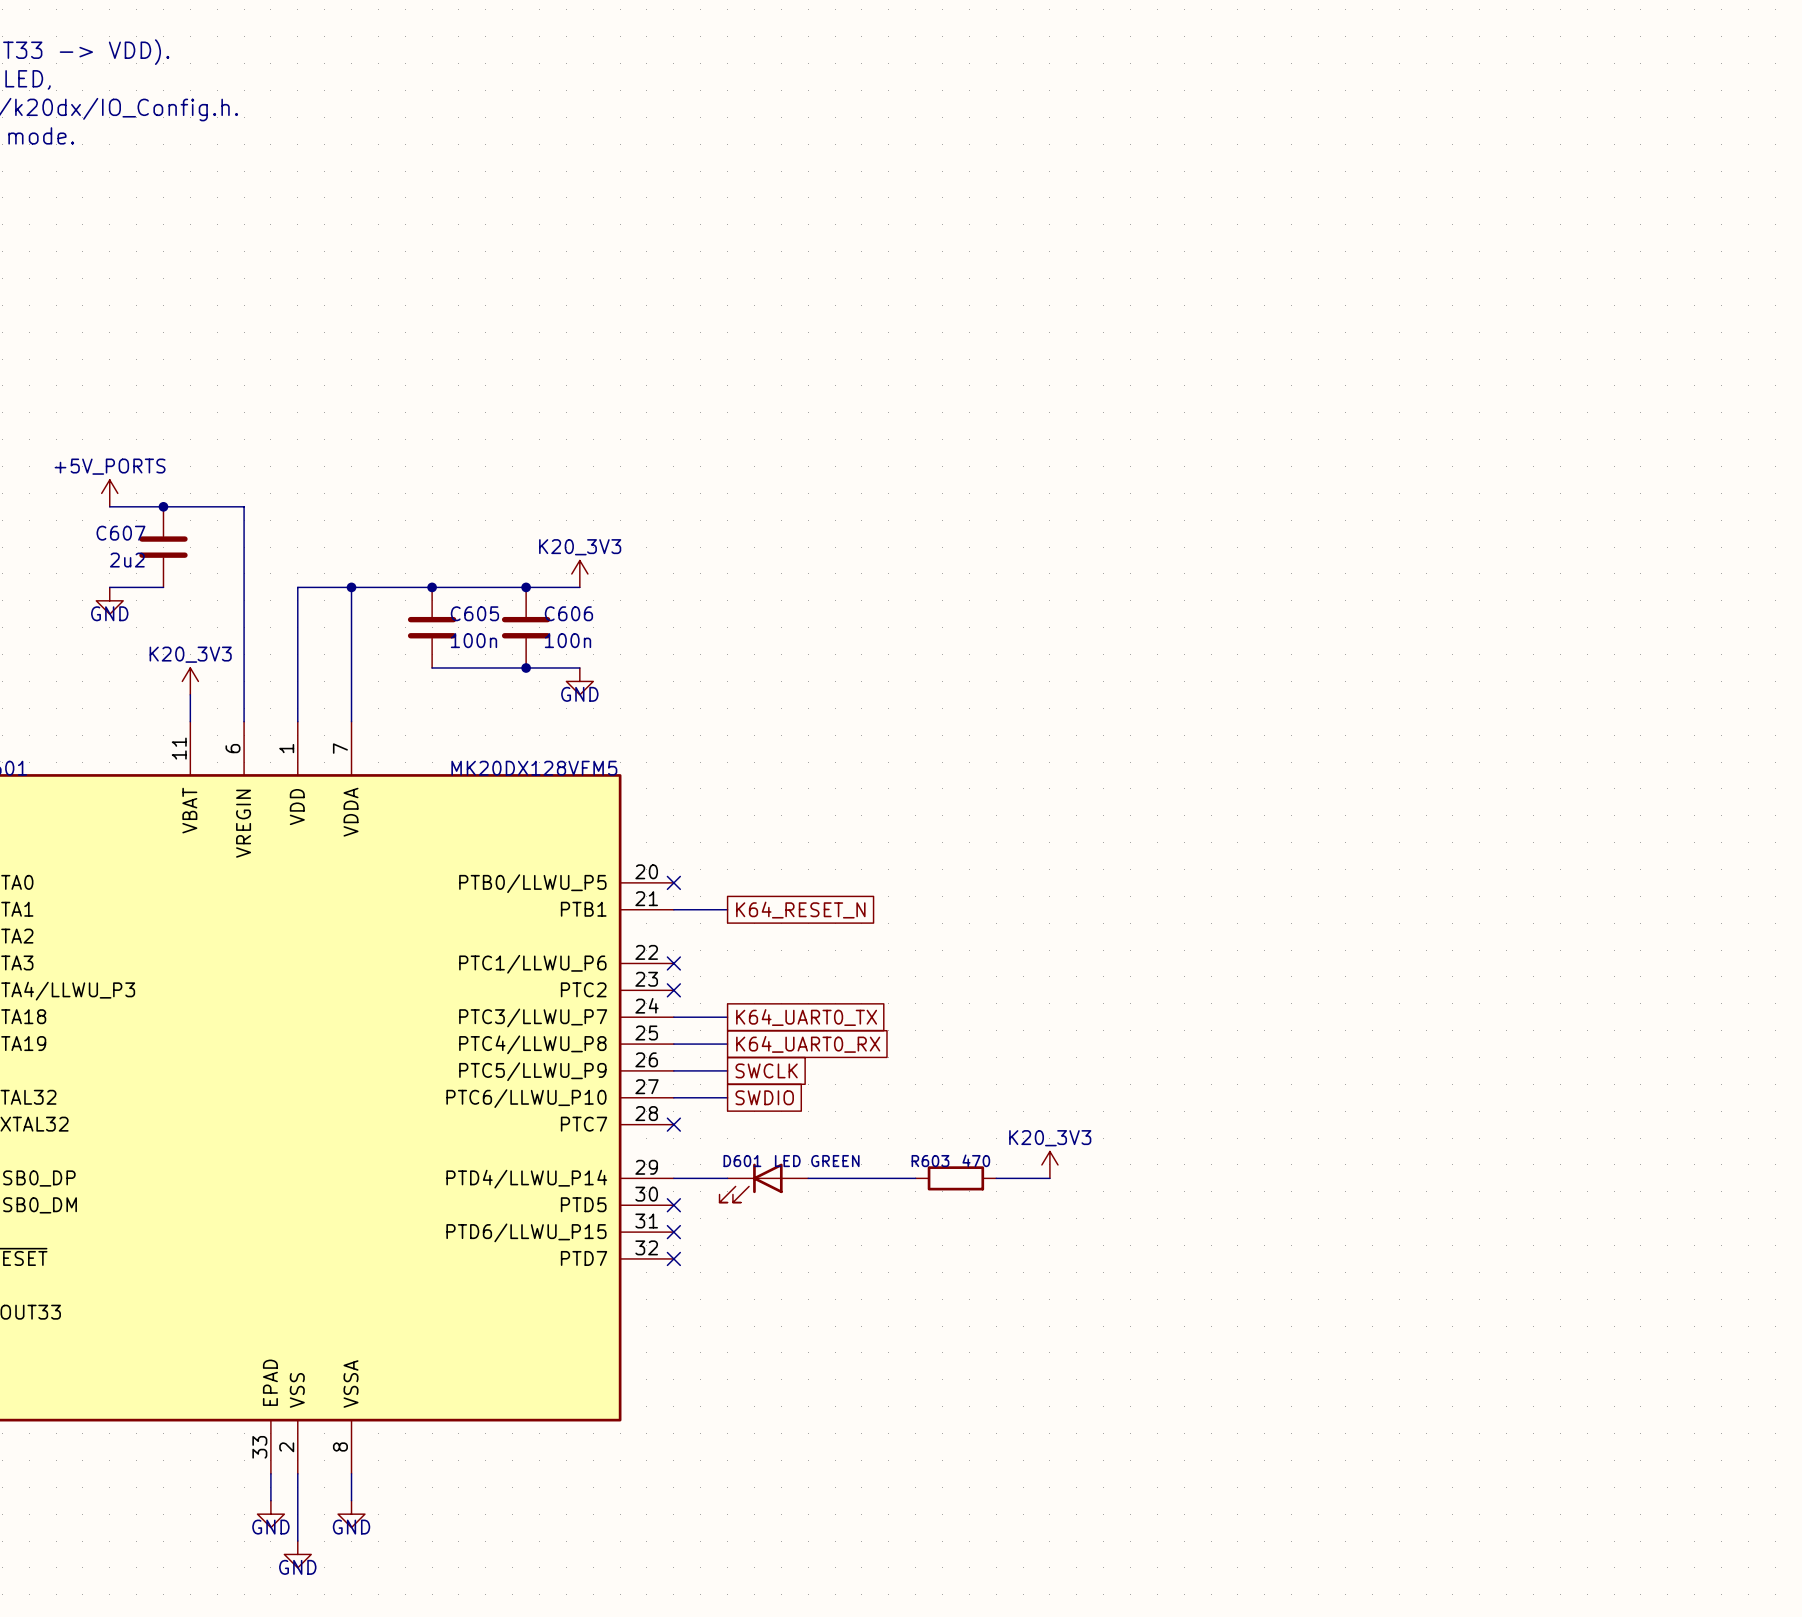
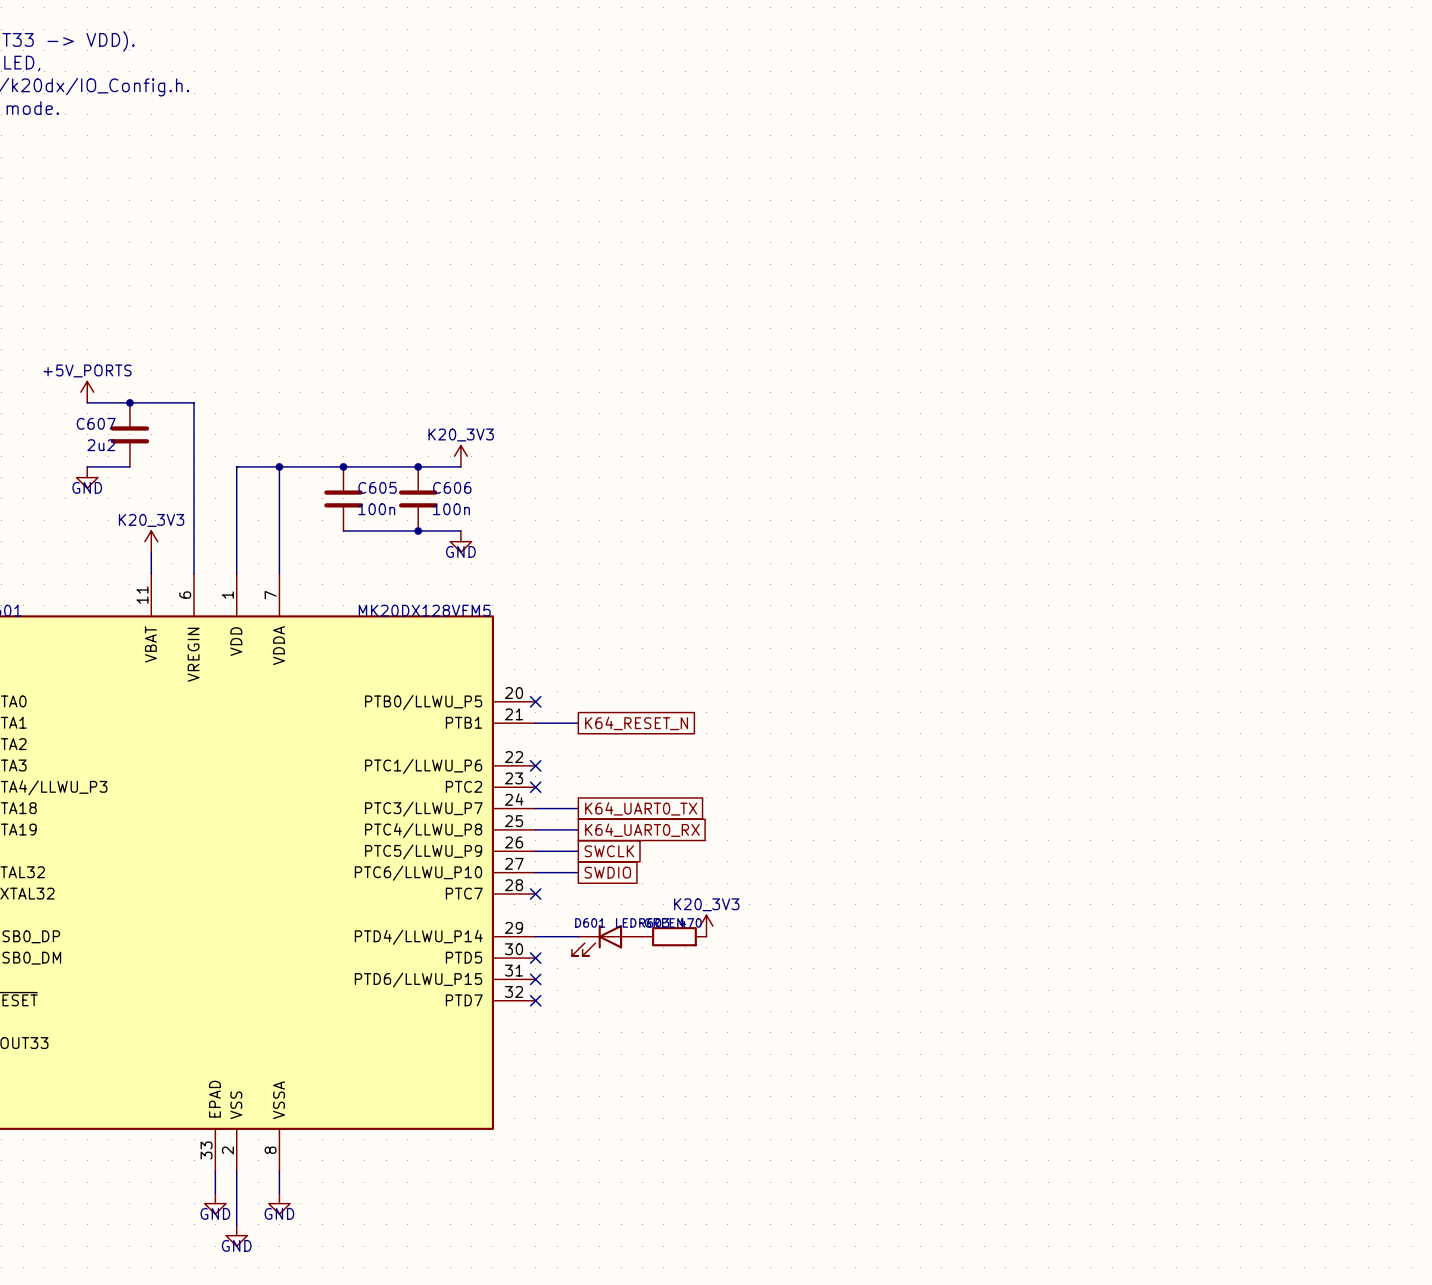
power symbol position: K20_3V3 (1049, 1164) -> K20_3V3 (706, 926)
wire: (808, 1178) (915, 1178) -> none
R603 position: (955, 1178) -> (674, 936)
wire: (996, 1178) (1049, 1178) -> none

